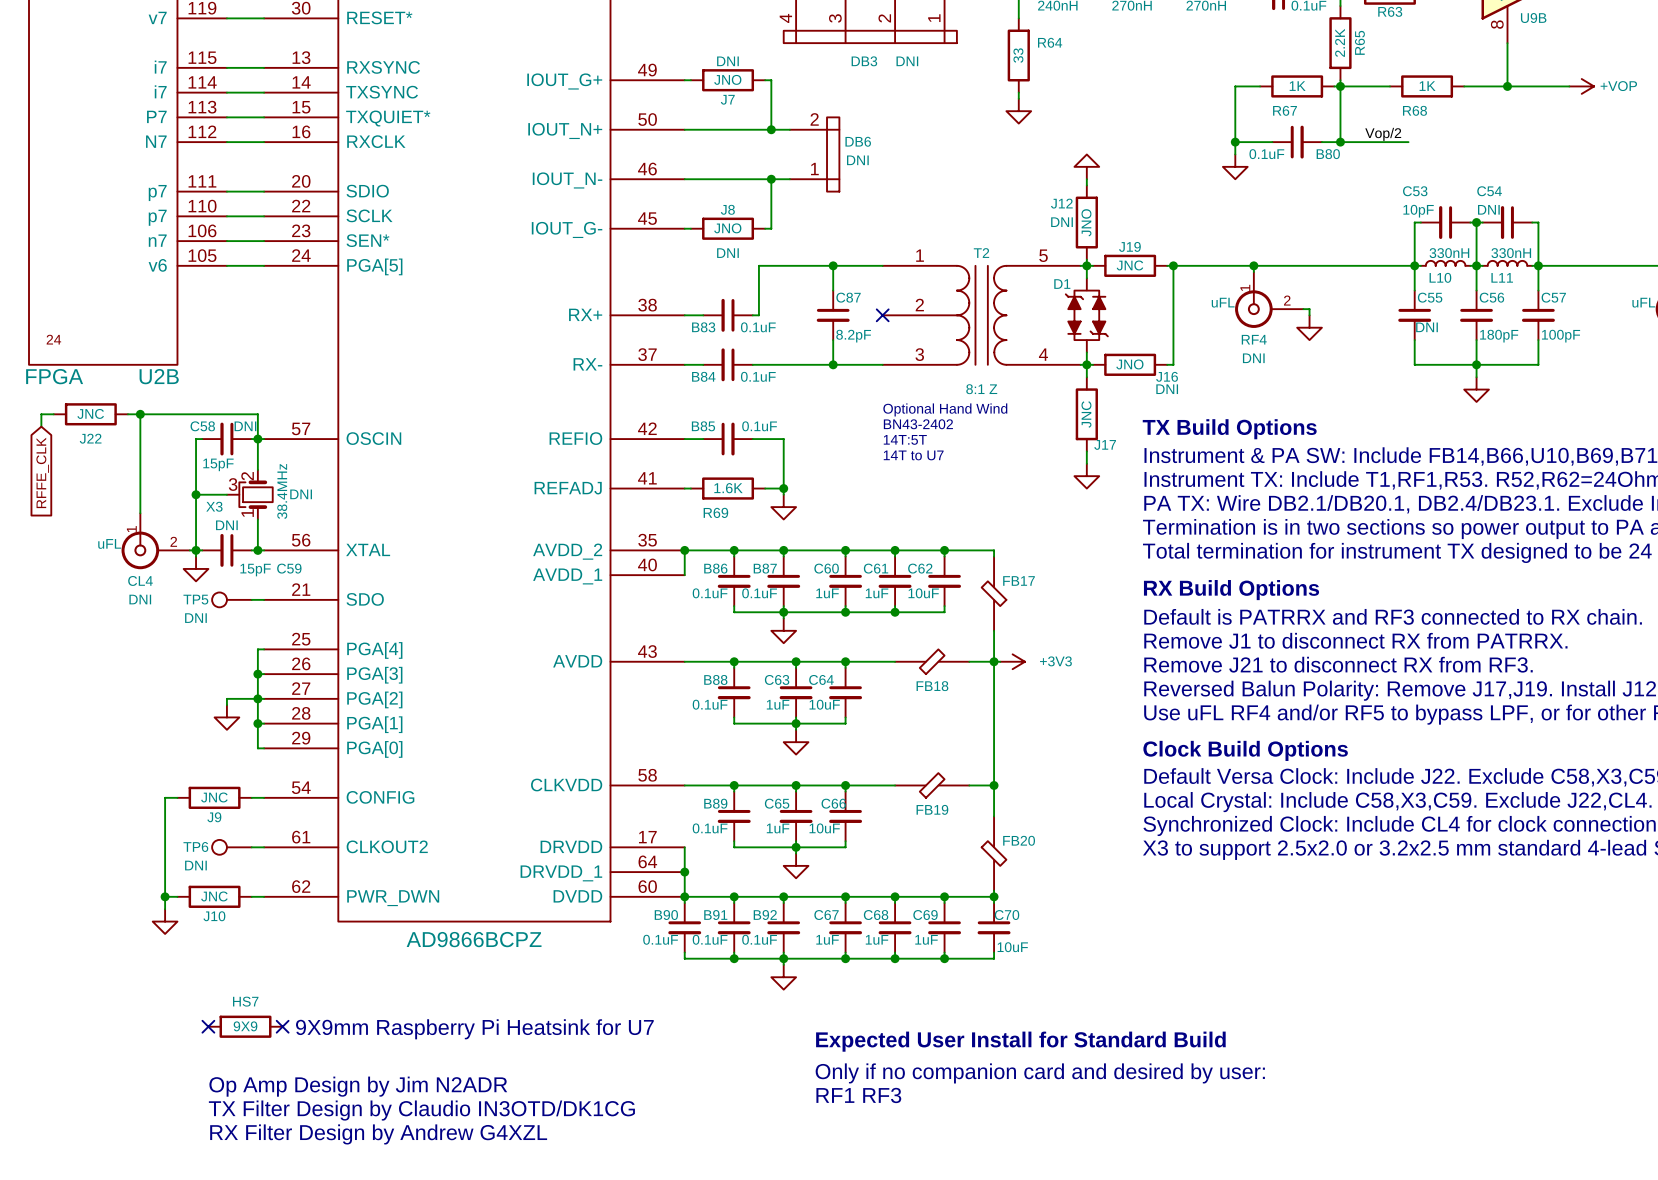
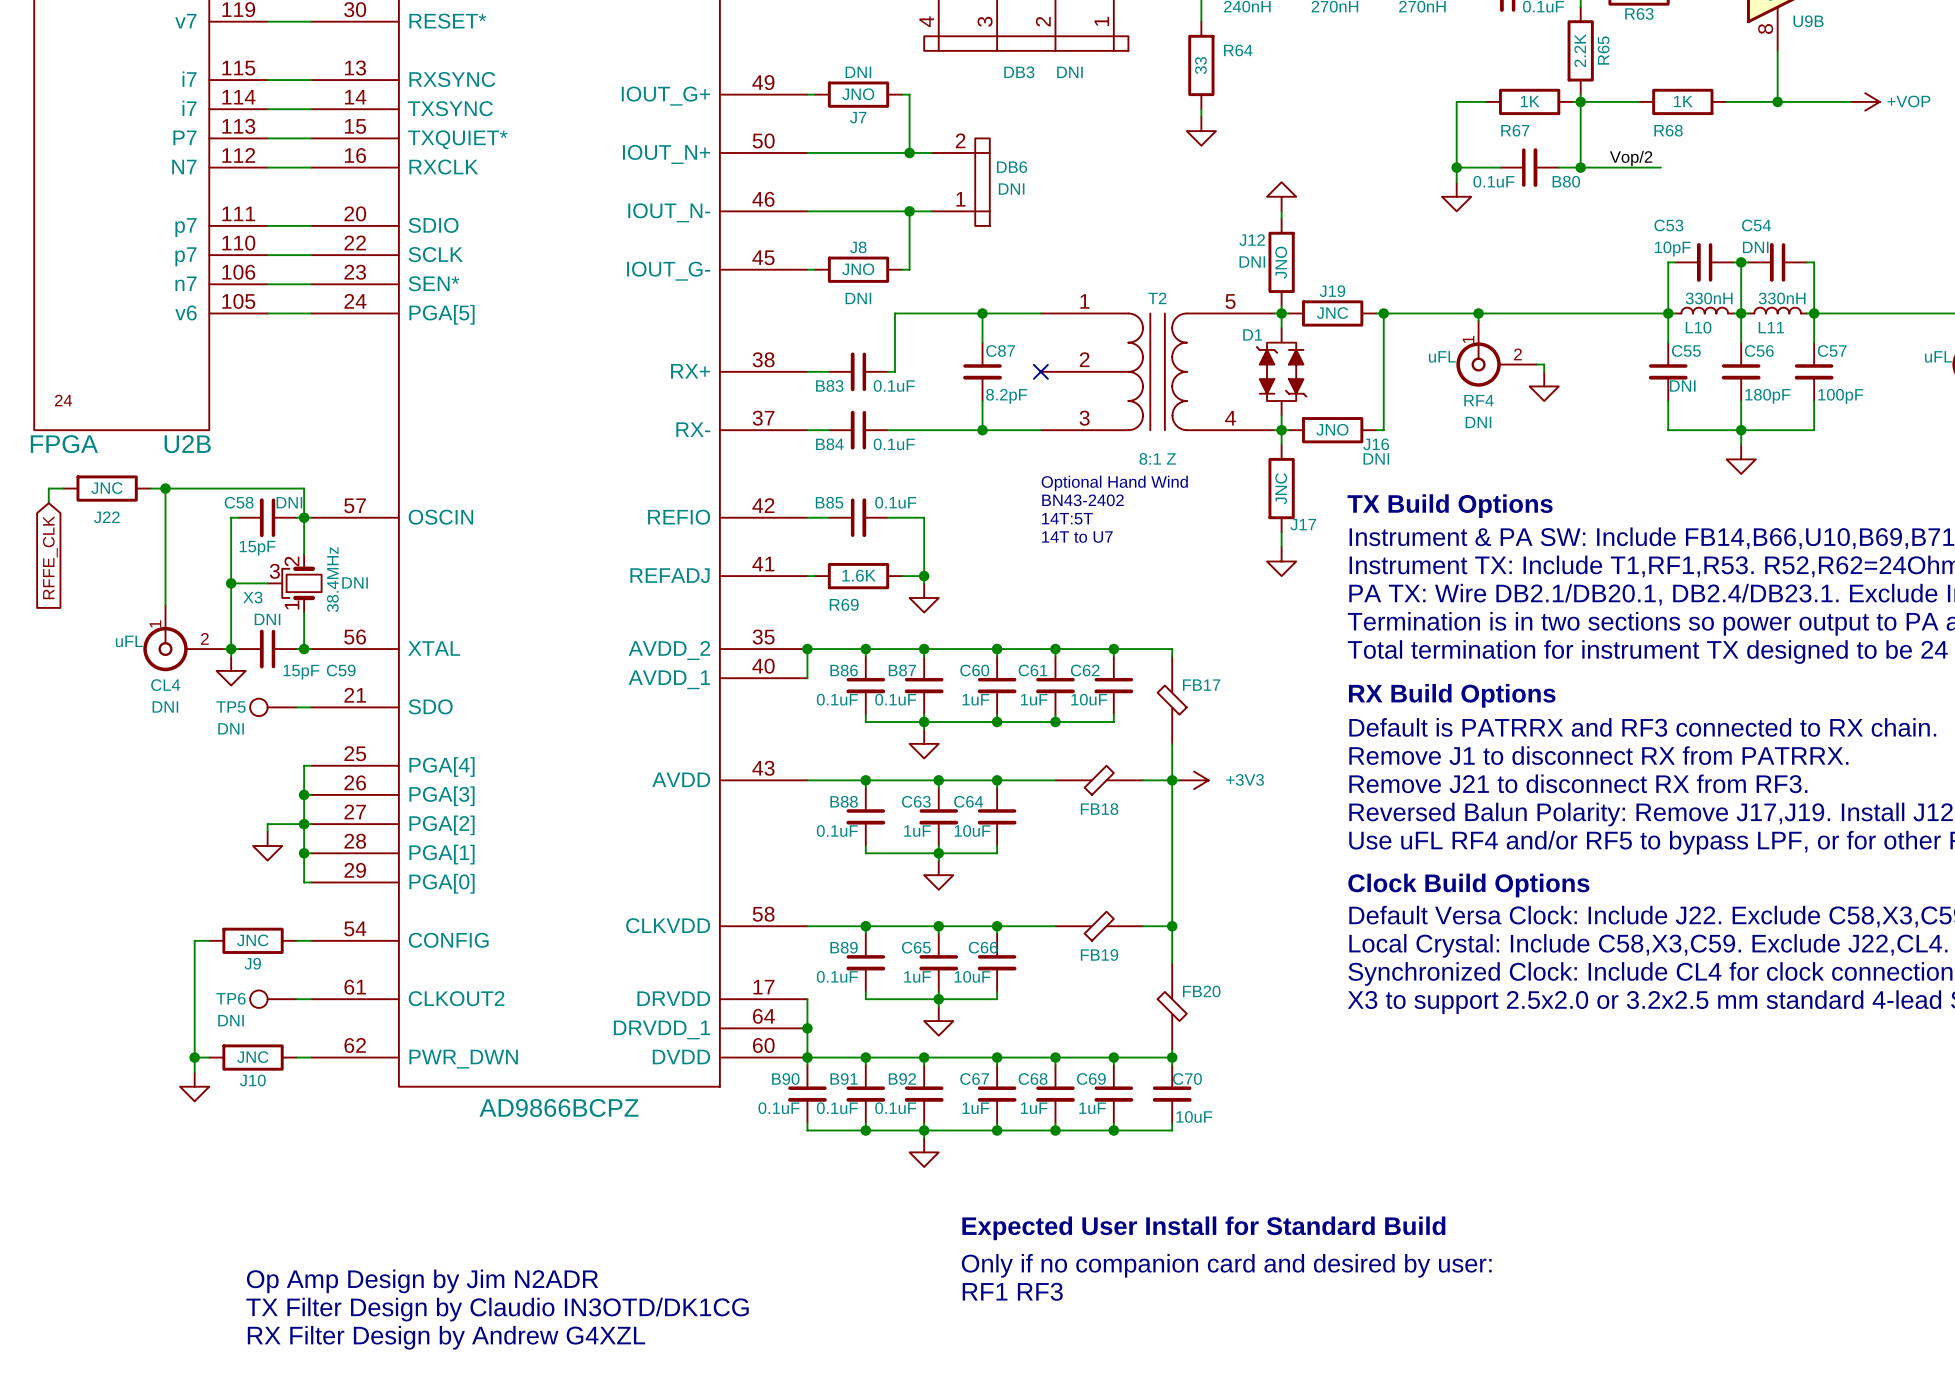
no-connect mark: (208, 1026) -> none
HS7: 9X9 (245, 1026) -> none
no-connect mark: (282, 1026) -> none
text: 9X9mm Raspberry Pi Heatsink for U7 (474, 1029) -> none

